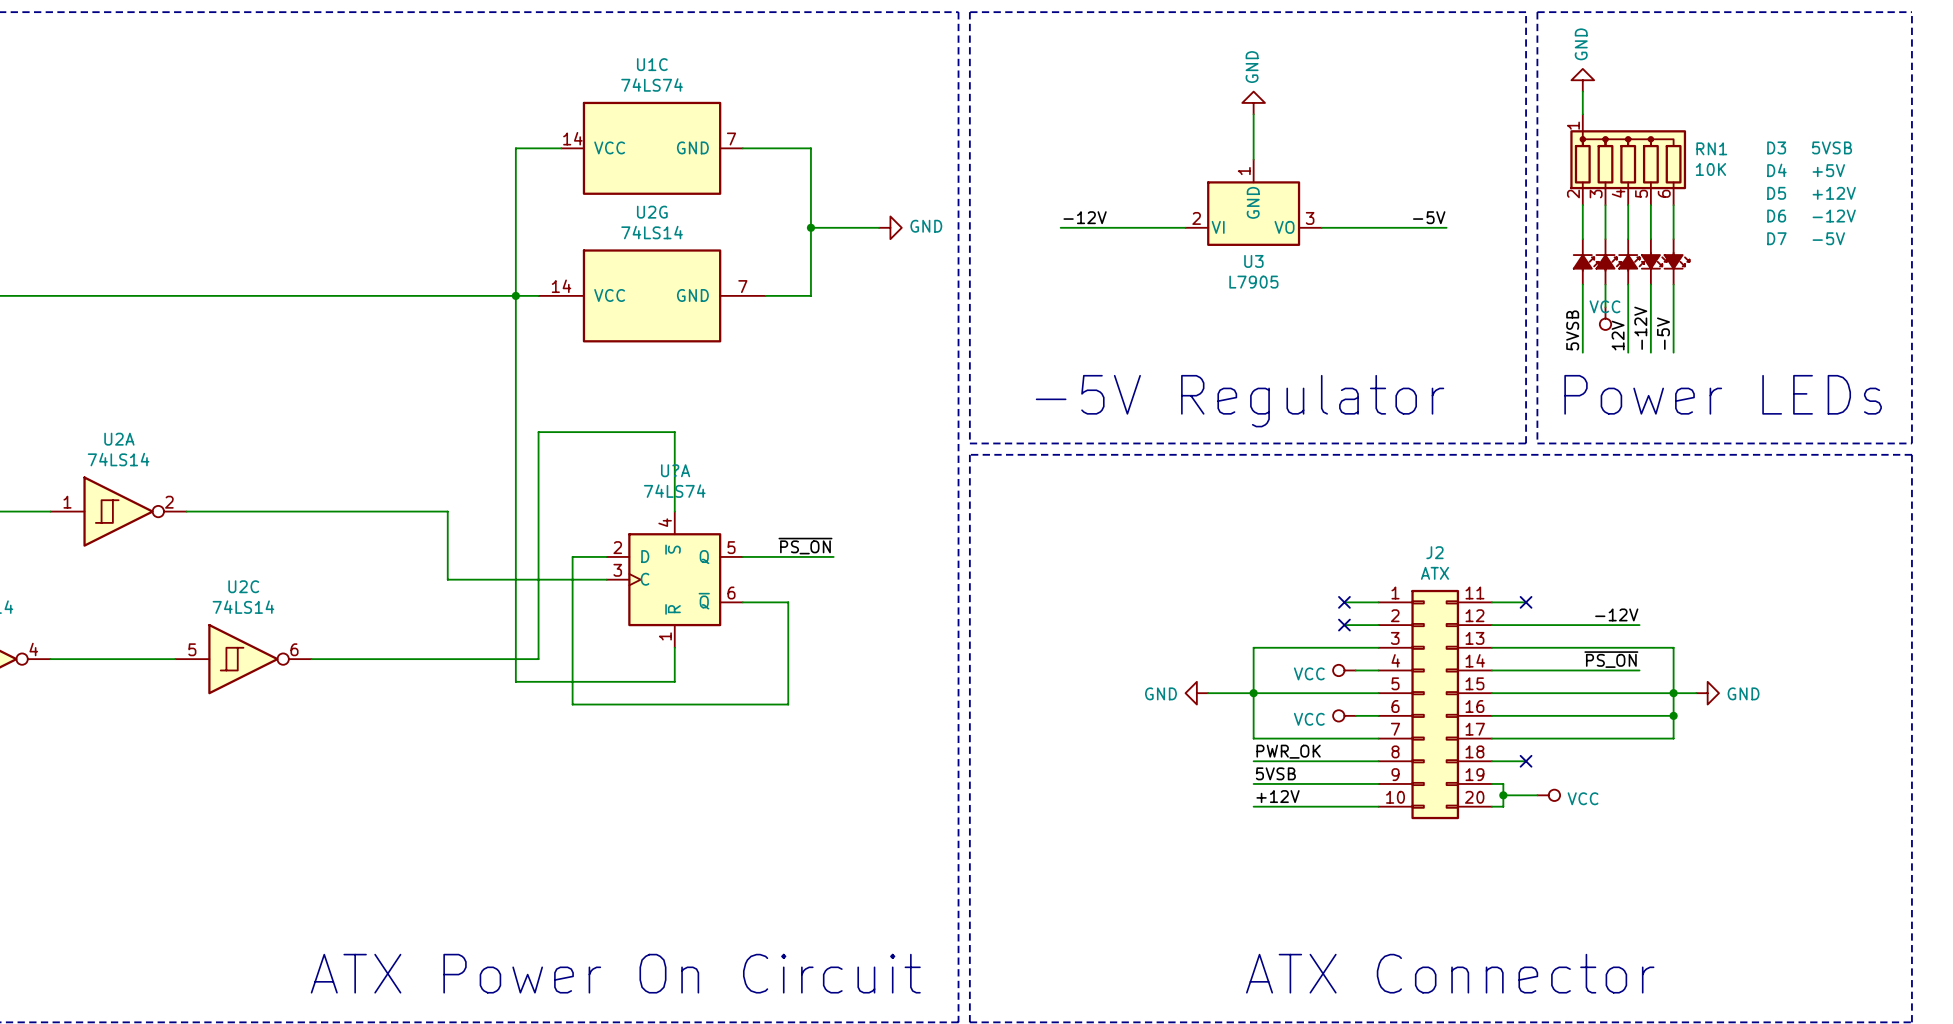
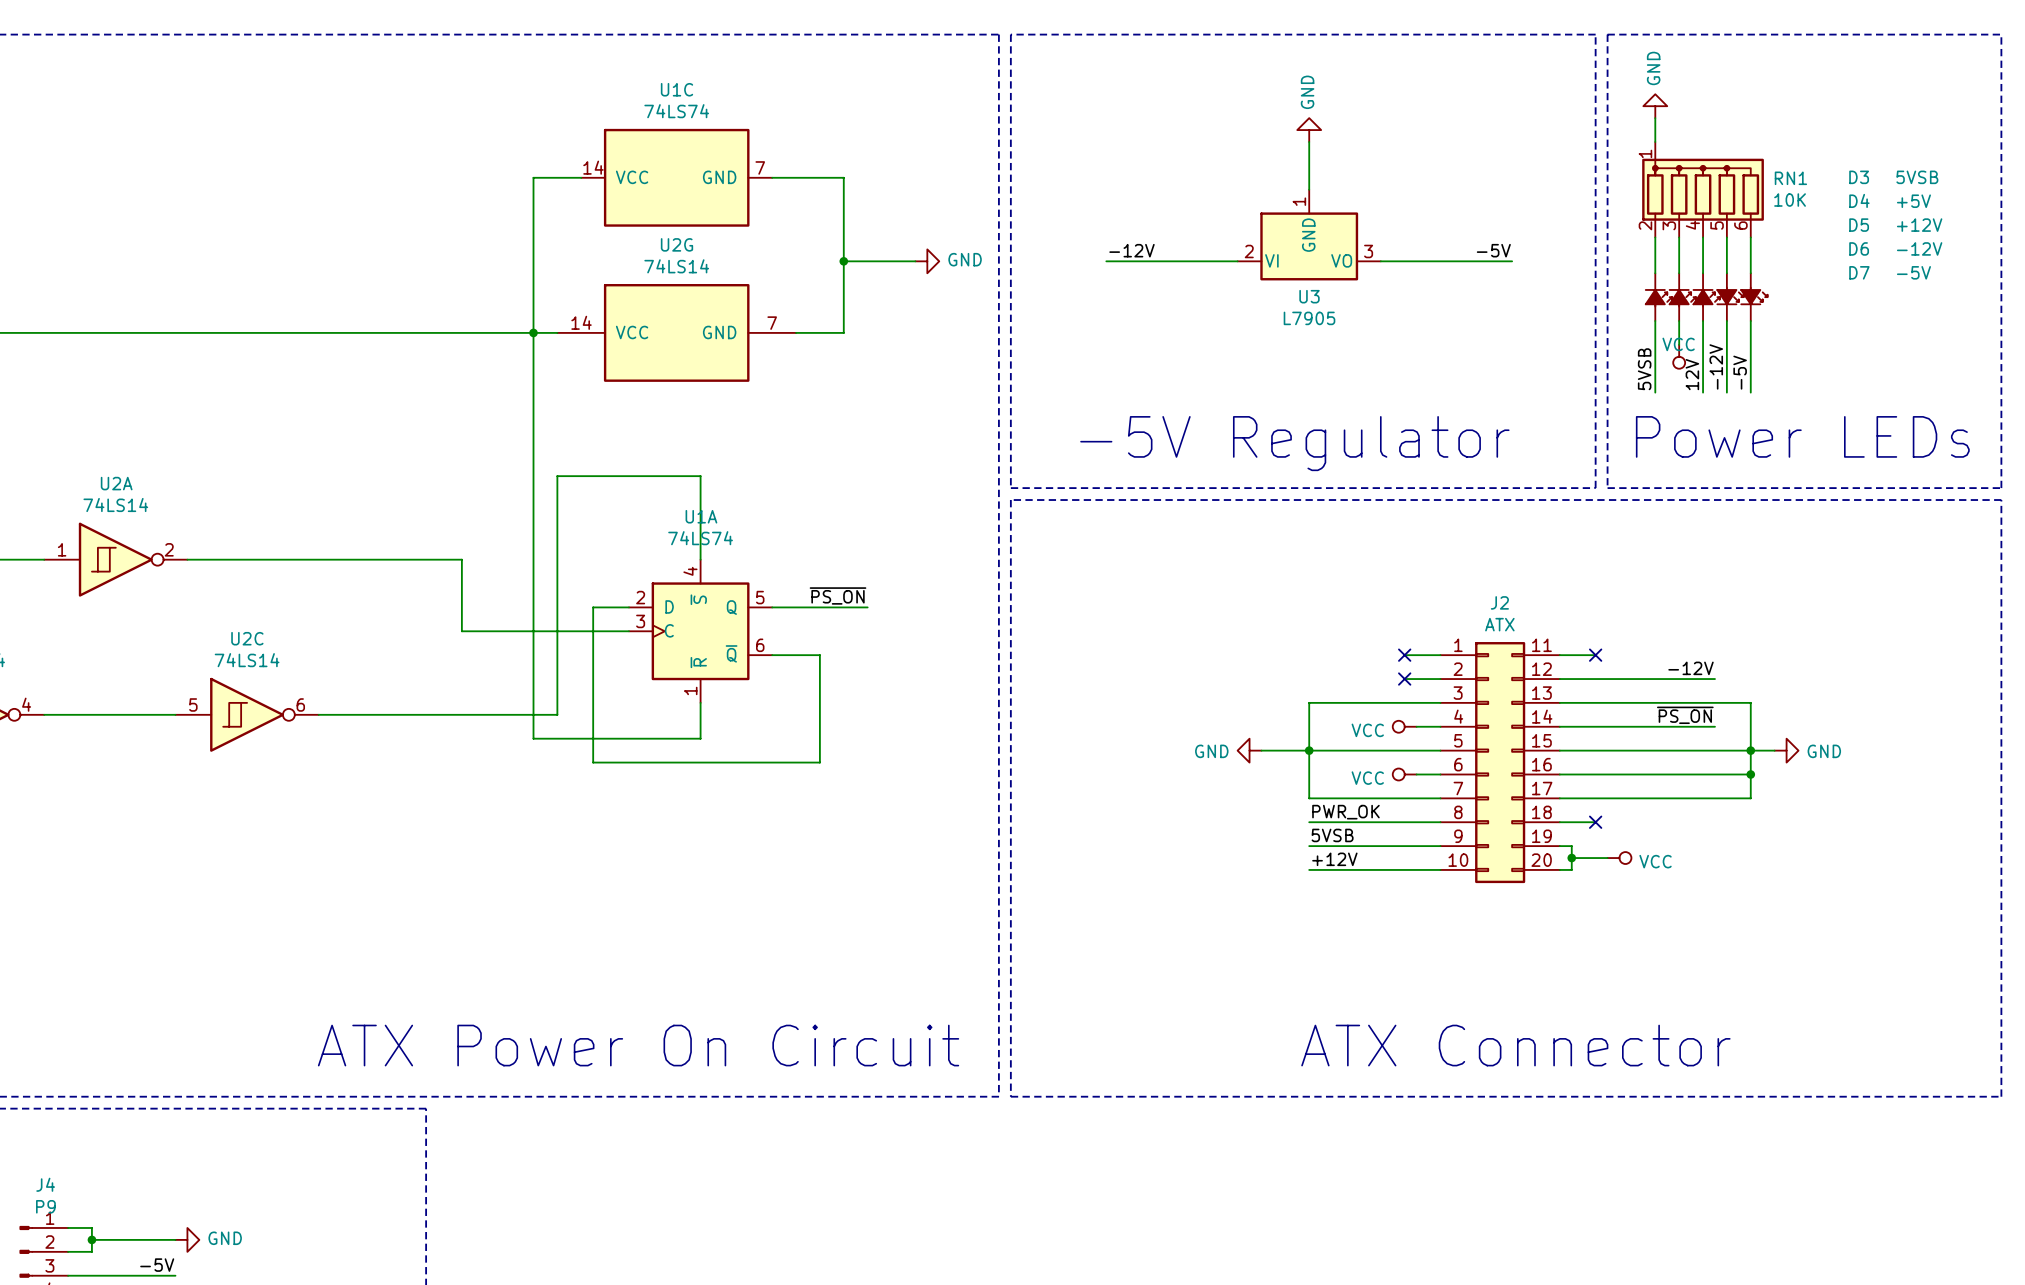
U?A name: U?A (675, 470) -> U1A (701, 516)

